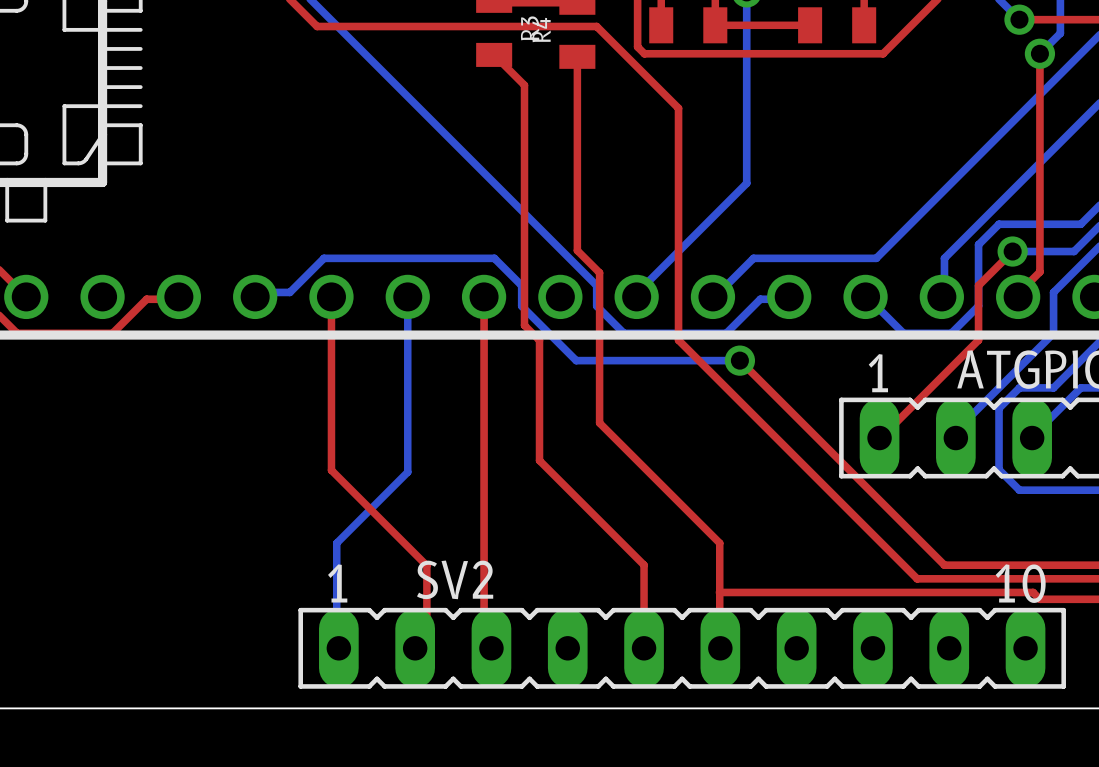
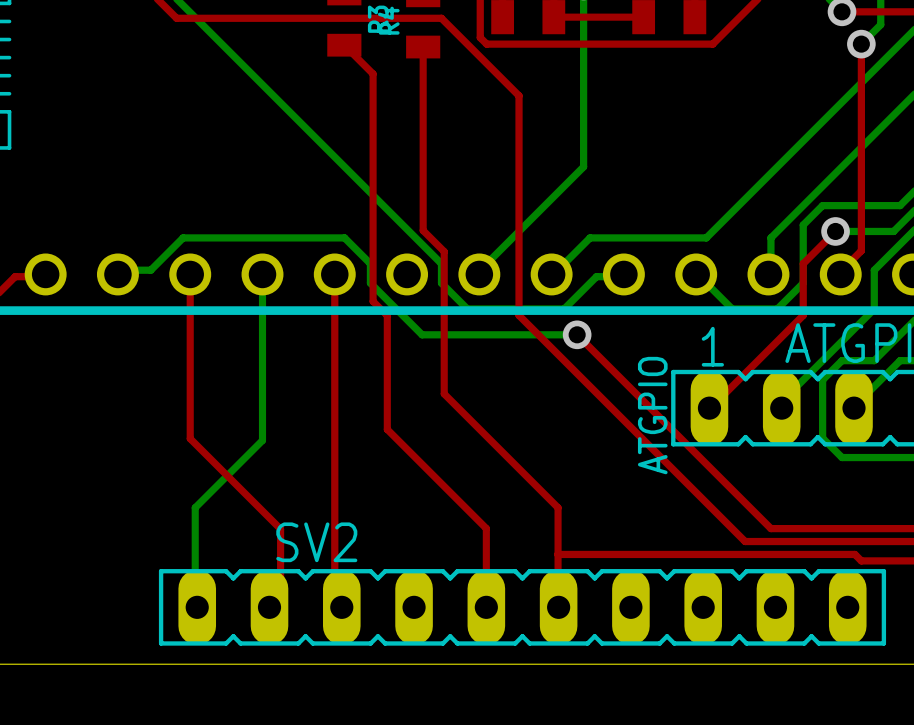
text: none -> ATGPIO (652, 415)
SV2 text: 1 (337, 583) -> none
SV2 text: 10 (1020, 583) -> none

